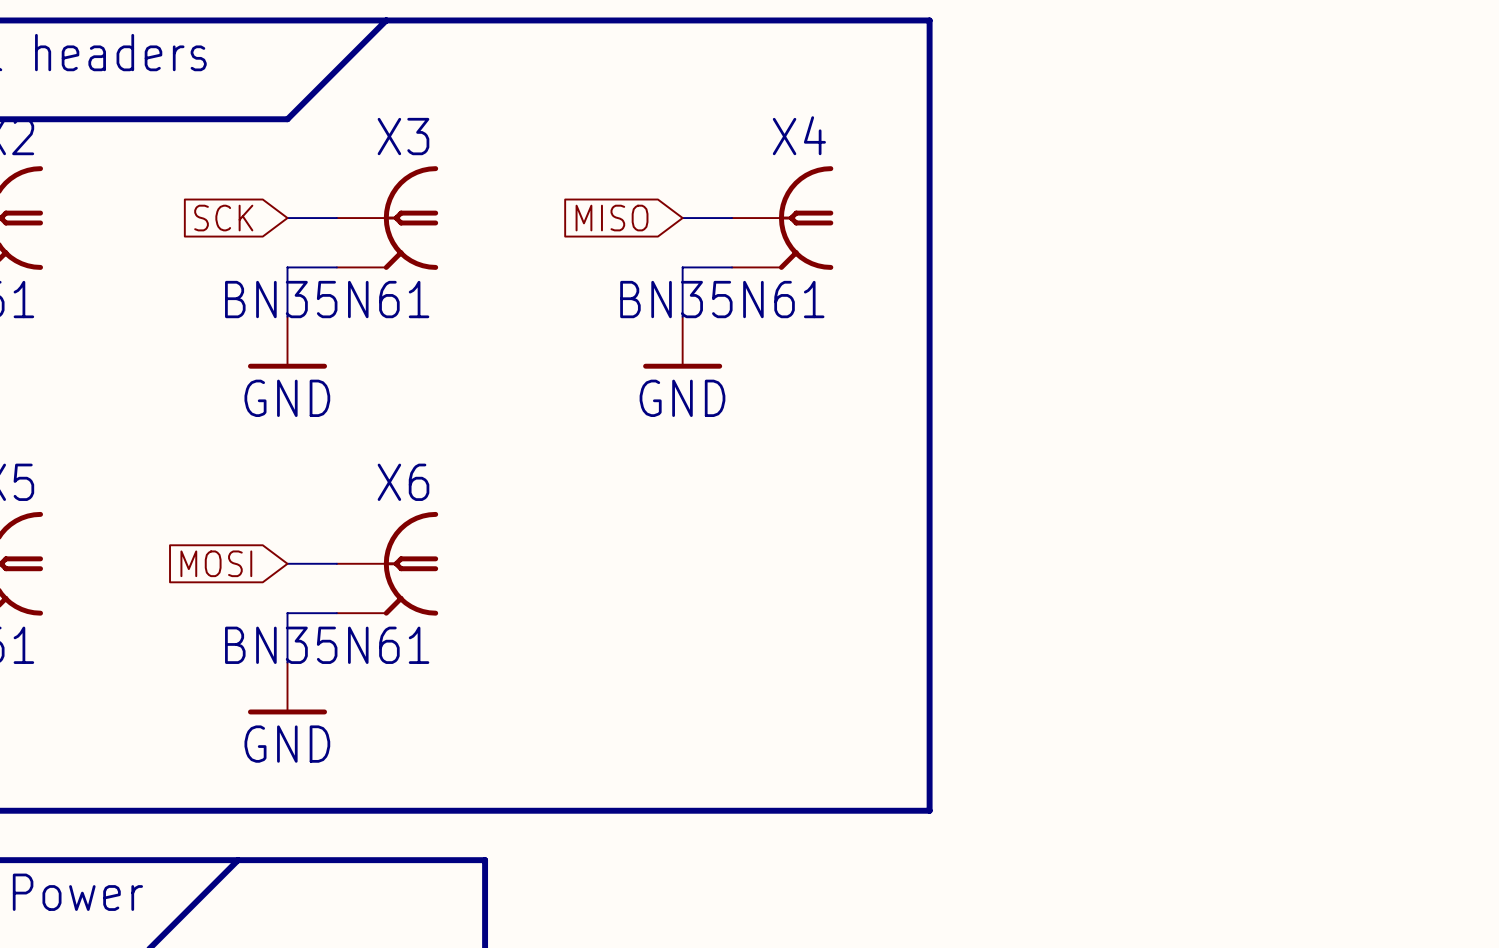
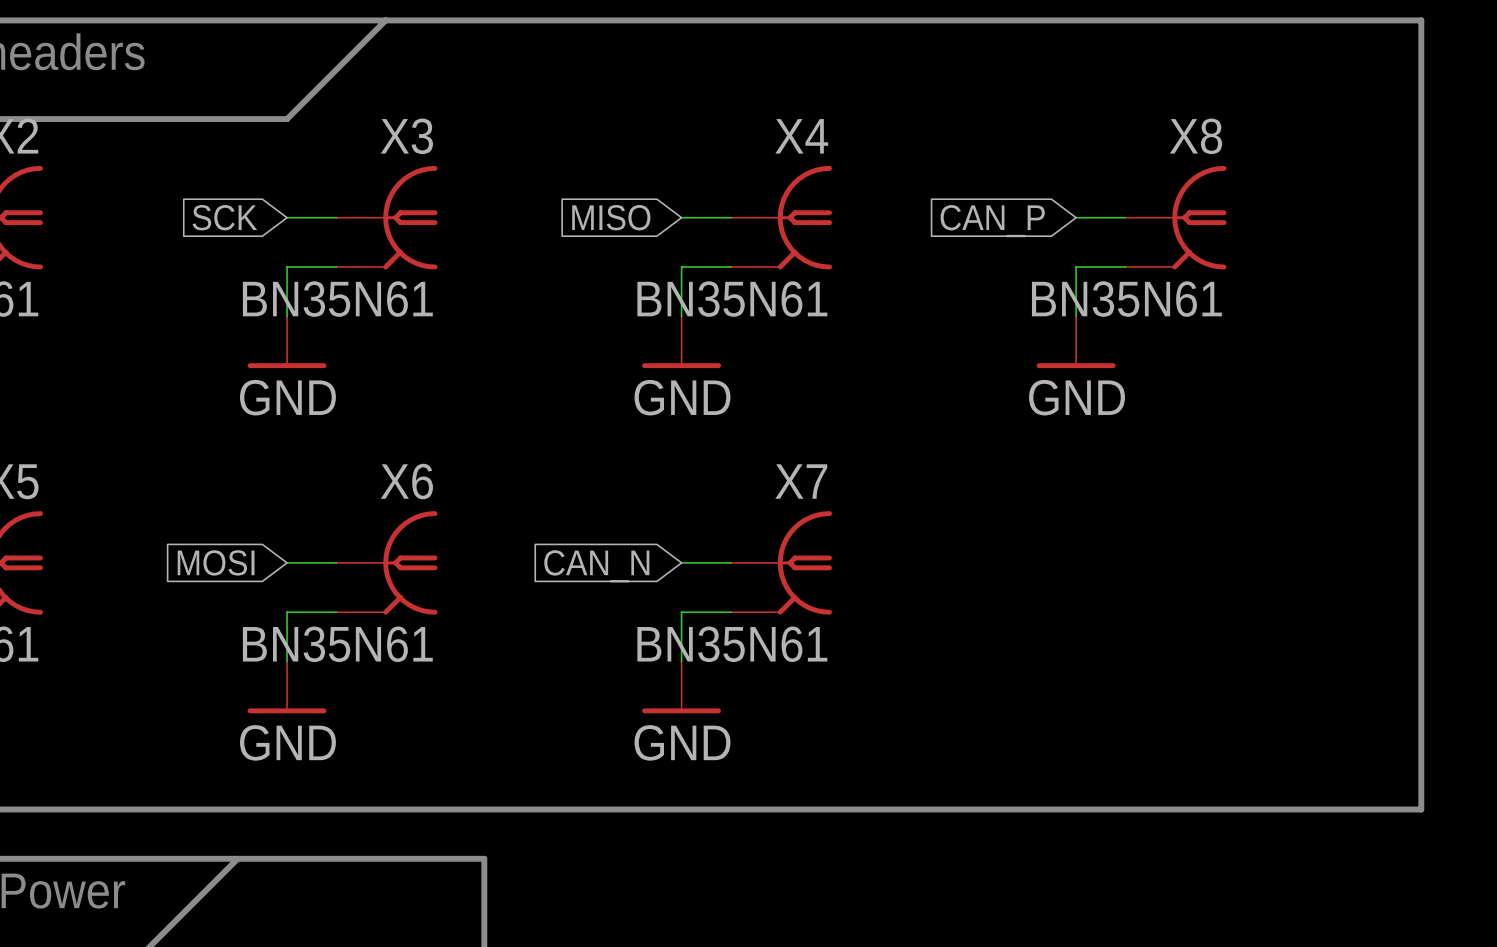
line: (929, 20) (929, 810) -> (928, 20) (1421, 20) (1421, 809) (928, 809)
wire: none -> (1076, 217) (1125, 217)
X8: none -> BN35N61 (1175, 217)
global label: none -> CAN_P (992, 221)
wire: none -> (1125, 267) (1076, 267) (1076, 316)
power symbol: none -> GND (1076, 342)
wire: none -> (681, 562) (730, 562)
X7: none -> BN35N61 (781, 562)
global label: none -> CAN_N (596, 566)
wire: none -> (730, 612) (681, 612) (681, 661)
power symbol: none -> GND (681, 687)

